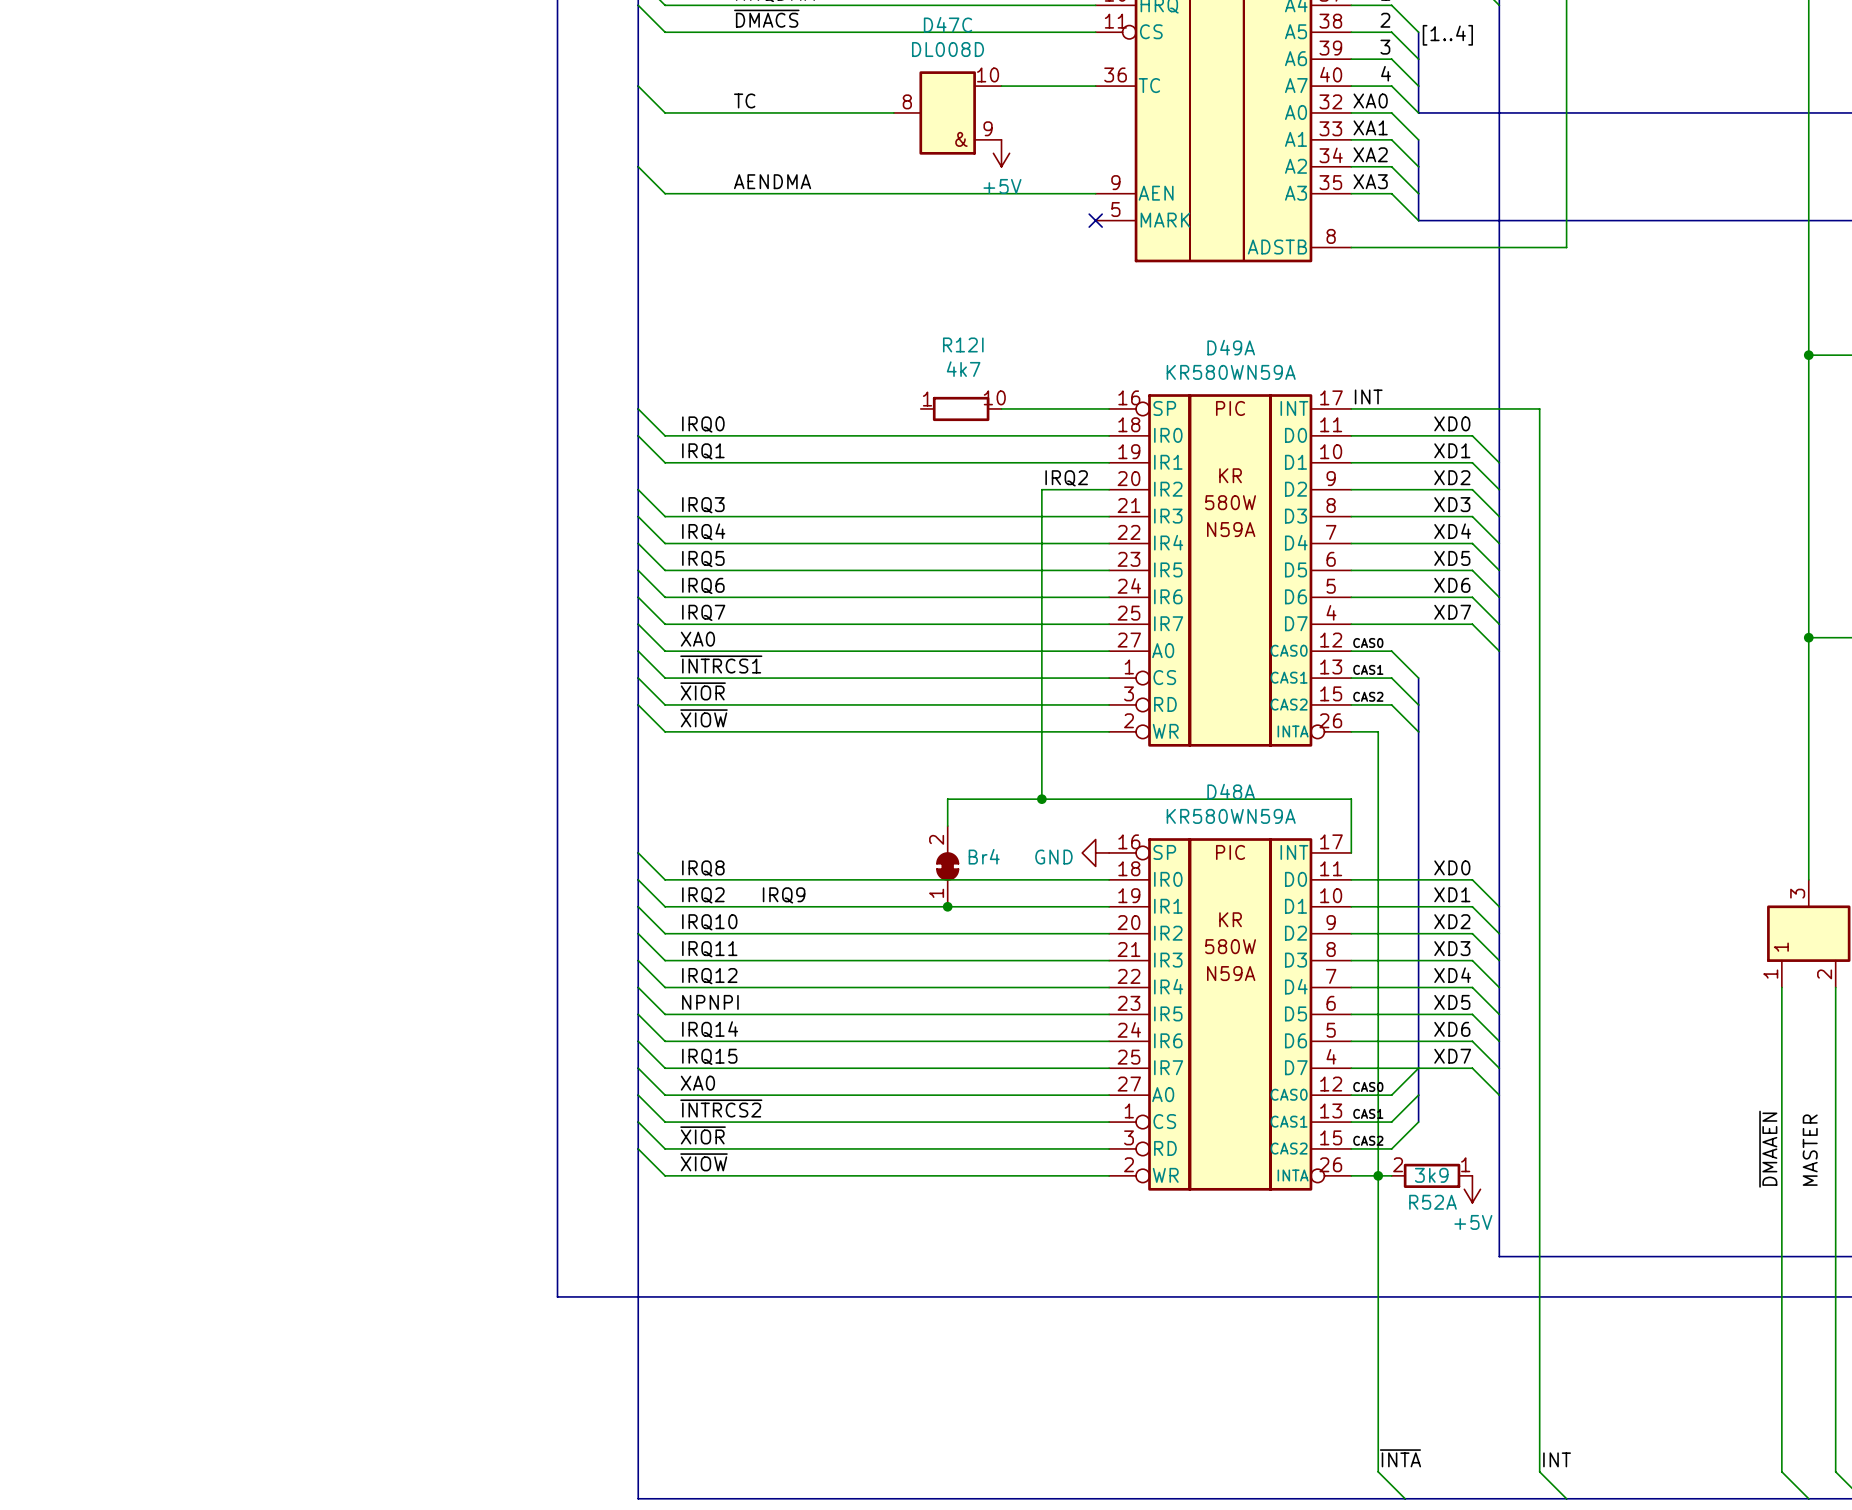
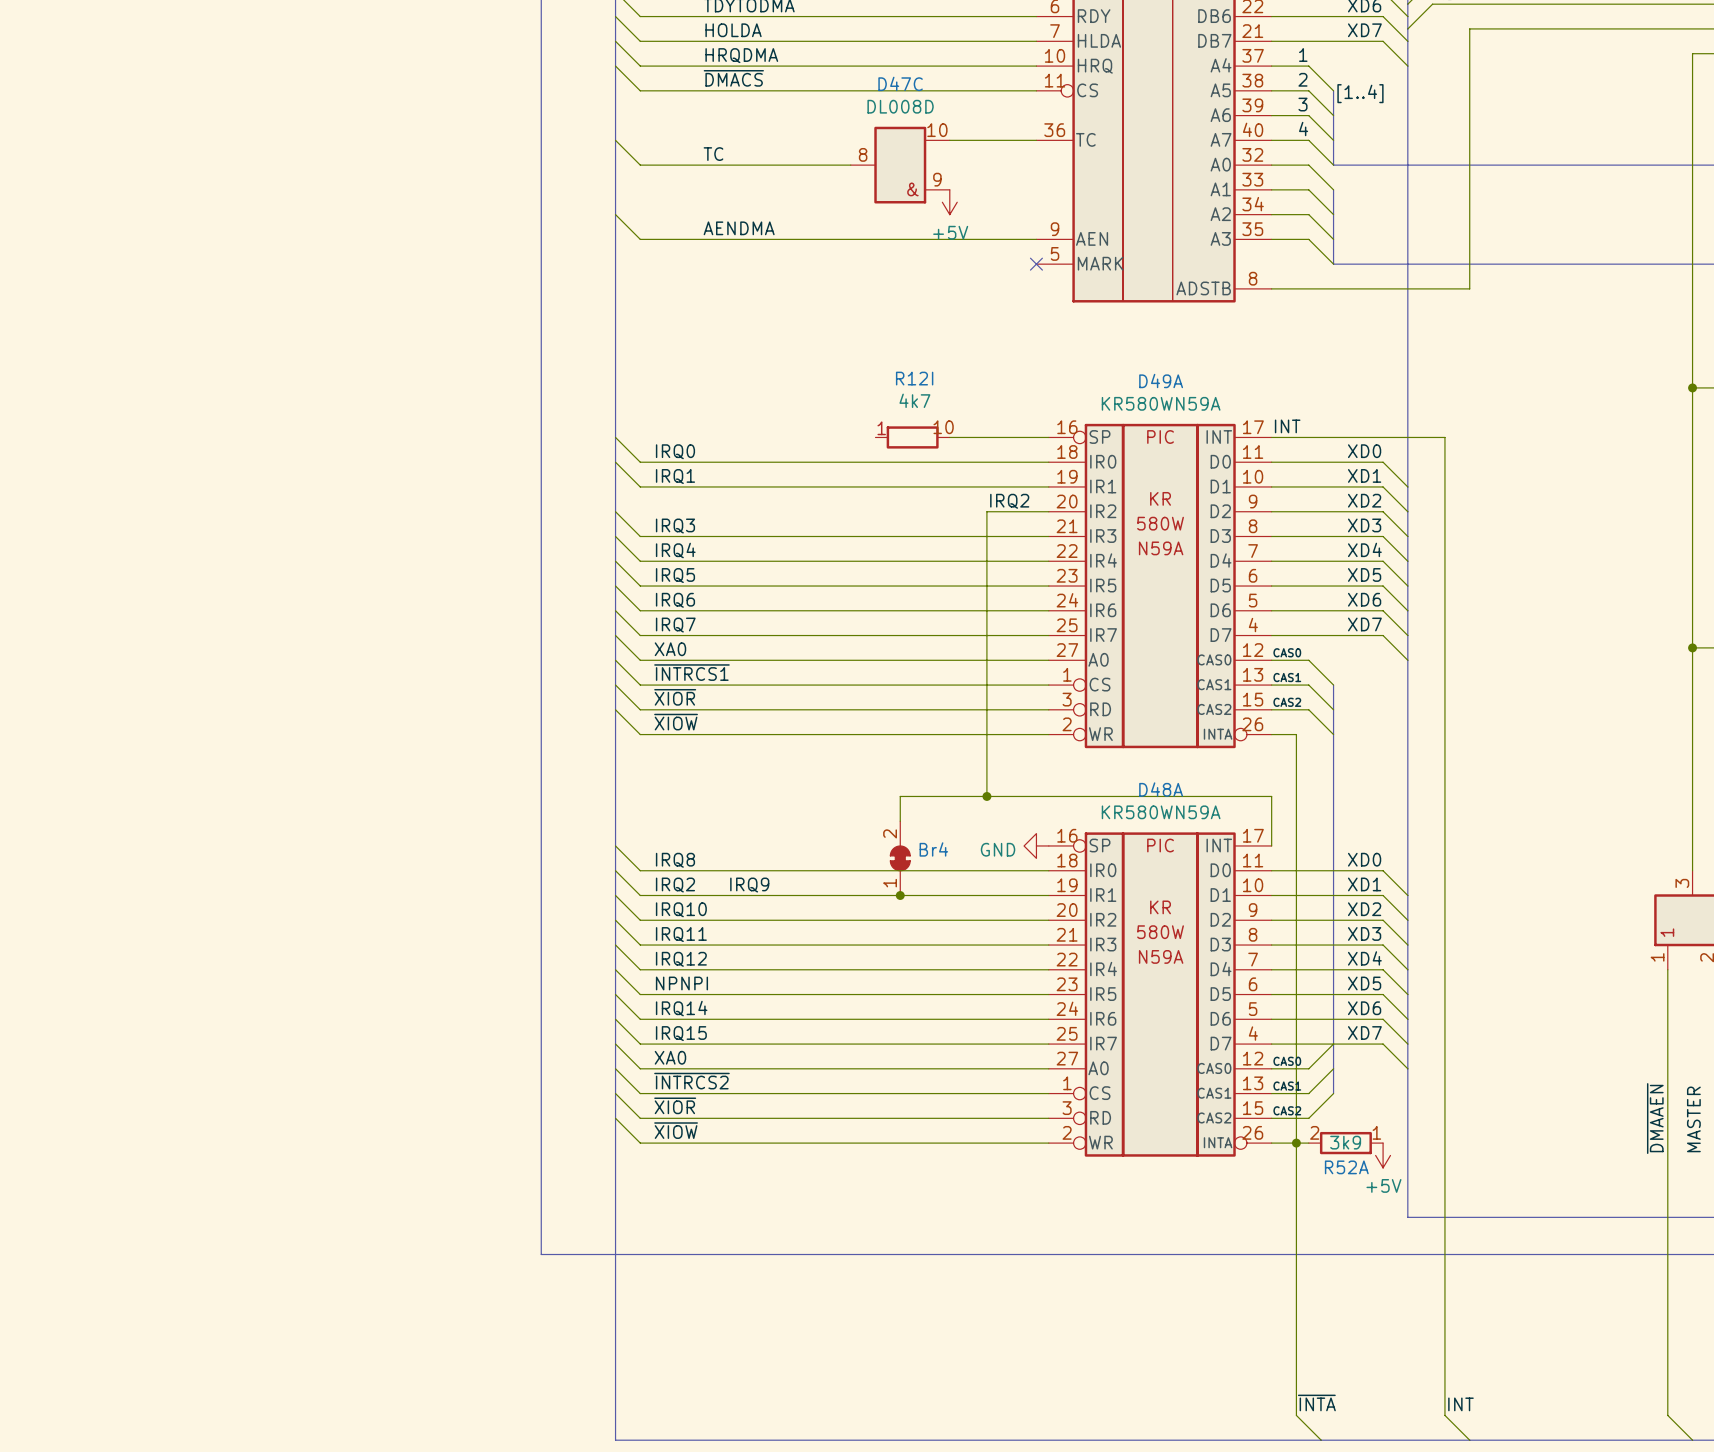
label: XA0 (1370, 100) -> none
label: XA1 (1370, 127) -> none
label: XA2 (1370, 154) -> none
label: XA3 (1370, 181) -> none

